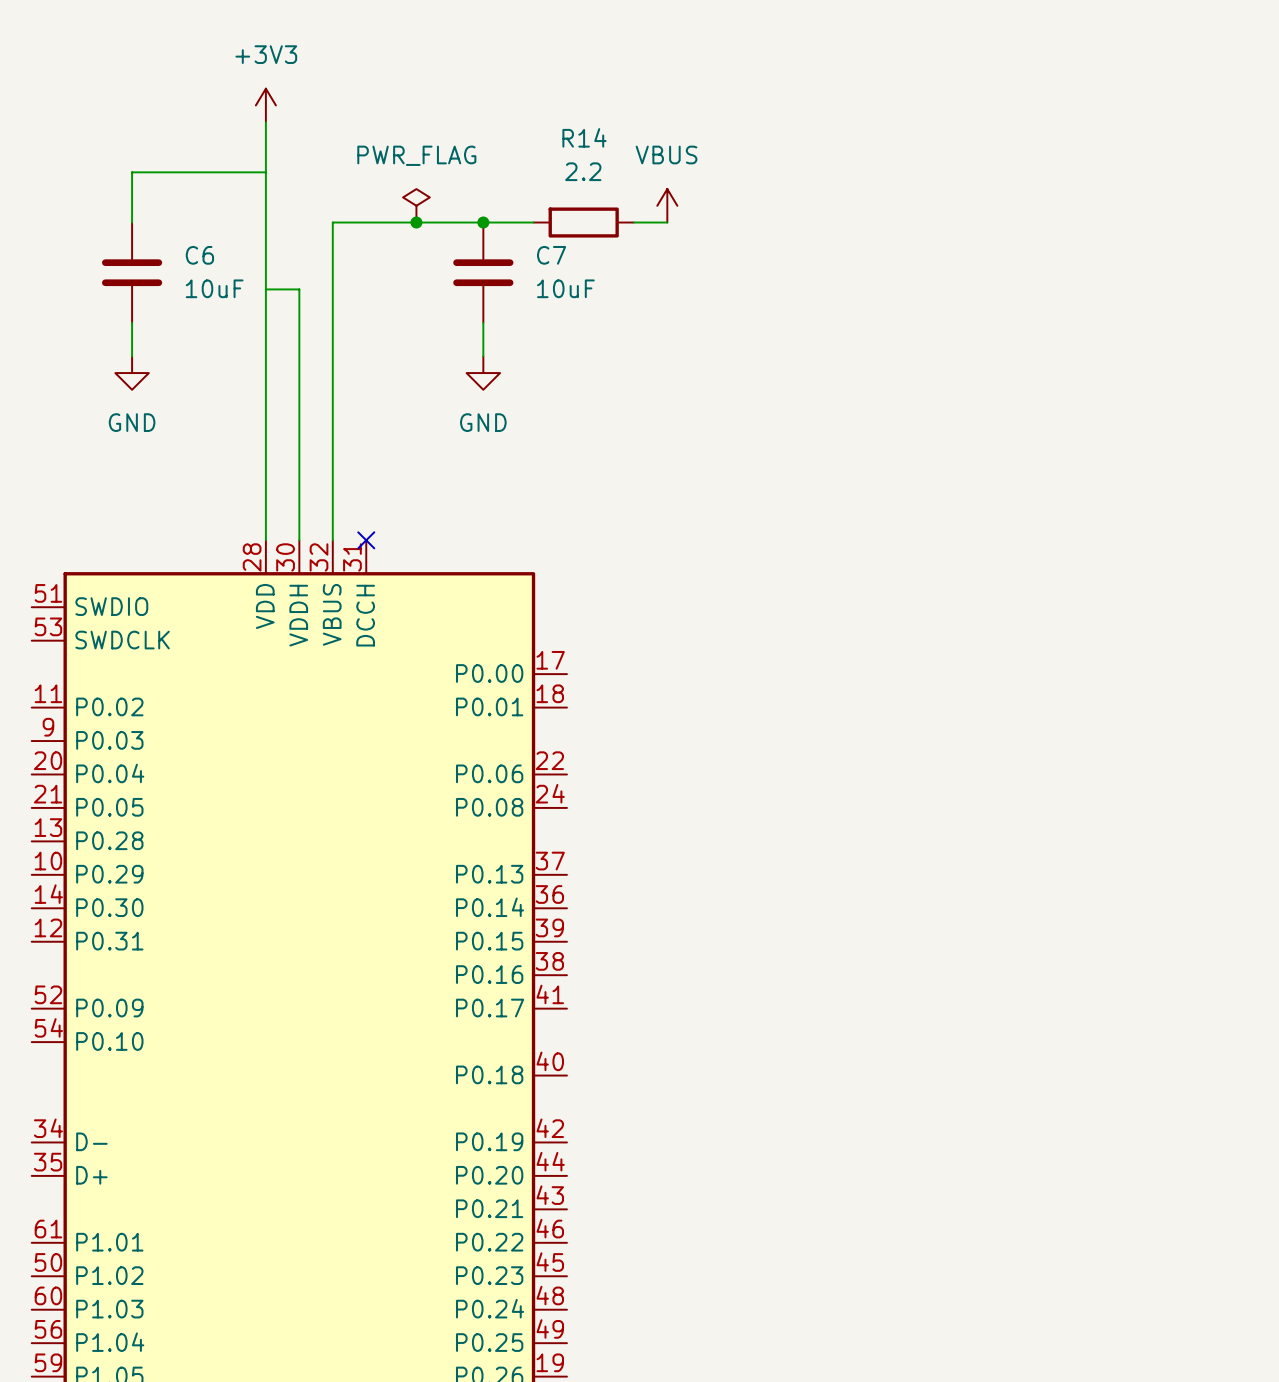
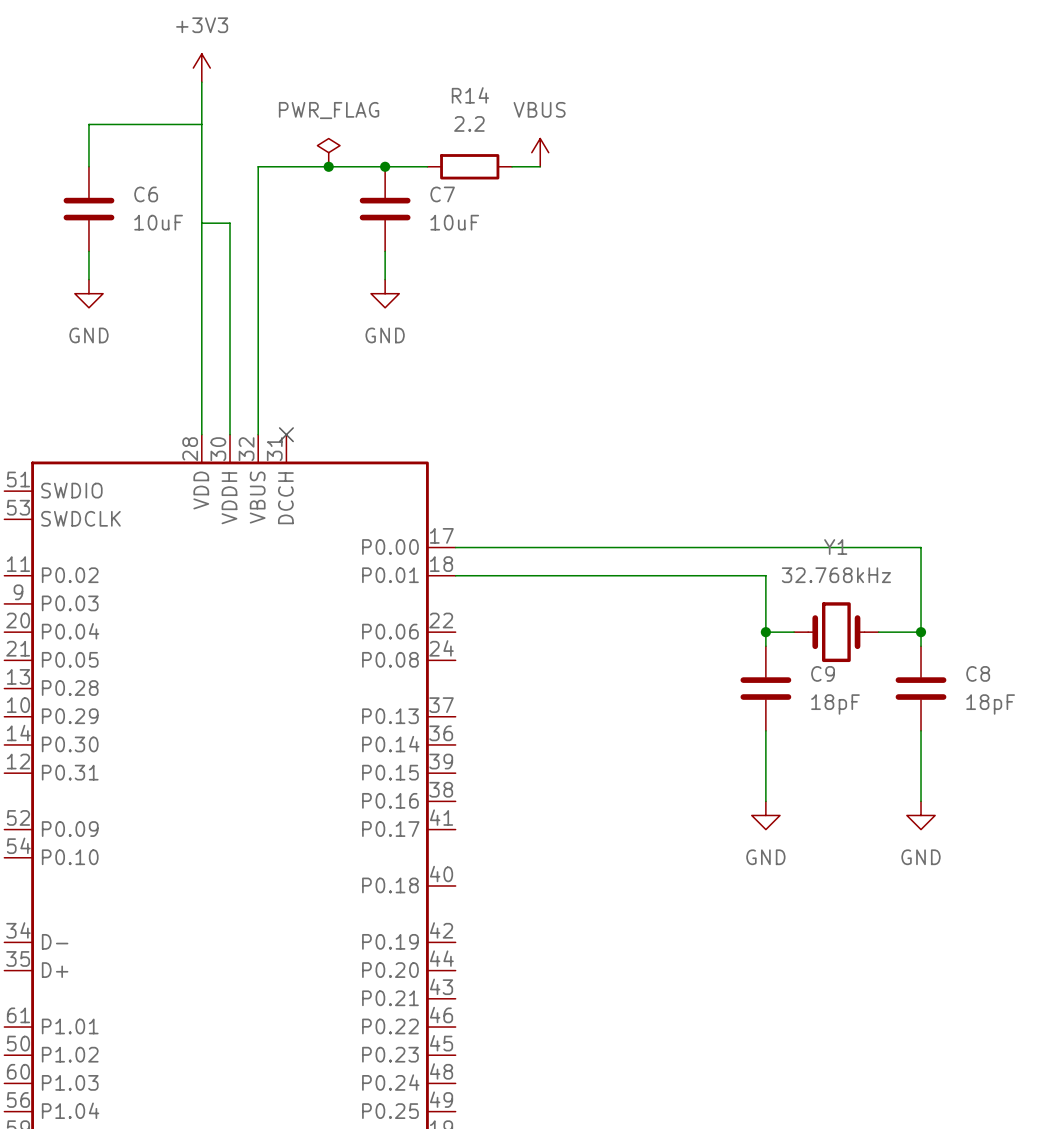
wire: none -> (455, 547) (921, 547) (921, 646)
wire: none -> (455, 575) (765, 575) (765, 646)
wire: none -> (765, 632) (794, 632)
junction: none -> (765, 632)
Y1: none -> 32.768kHz (836, 632)
wire: none -> (878, 632) (921, 632)
junction: none -> (921, 632)
C9: none -> 18pF (765, 688)
C8: none -> 18pF (921, 688)
wire: none -> (765, 730) (765, 801)
wire: none -> (921, 730) (921, 801)
power symbol: none -> GND (765, 815)
power symbol: none -> GND (921, 815)

